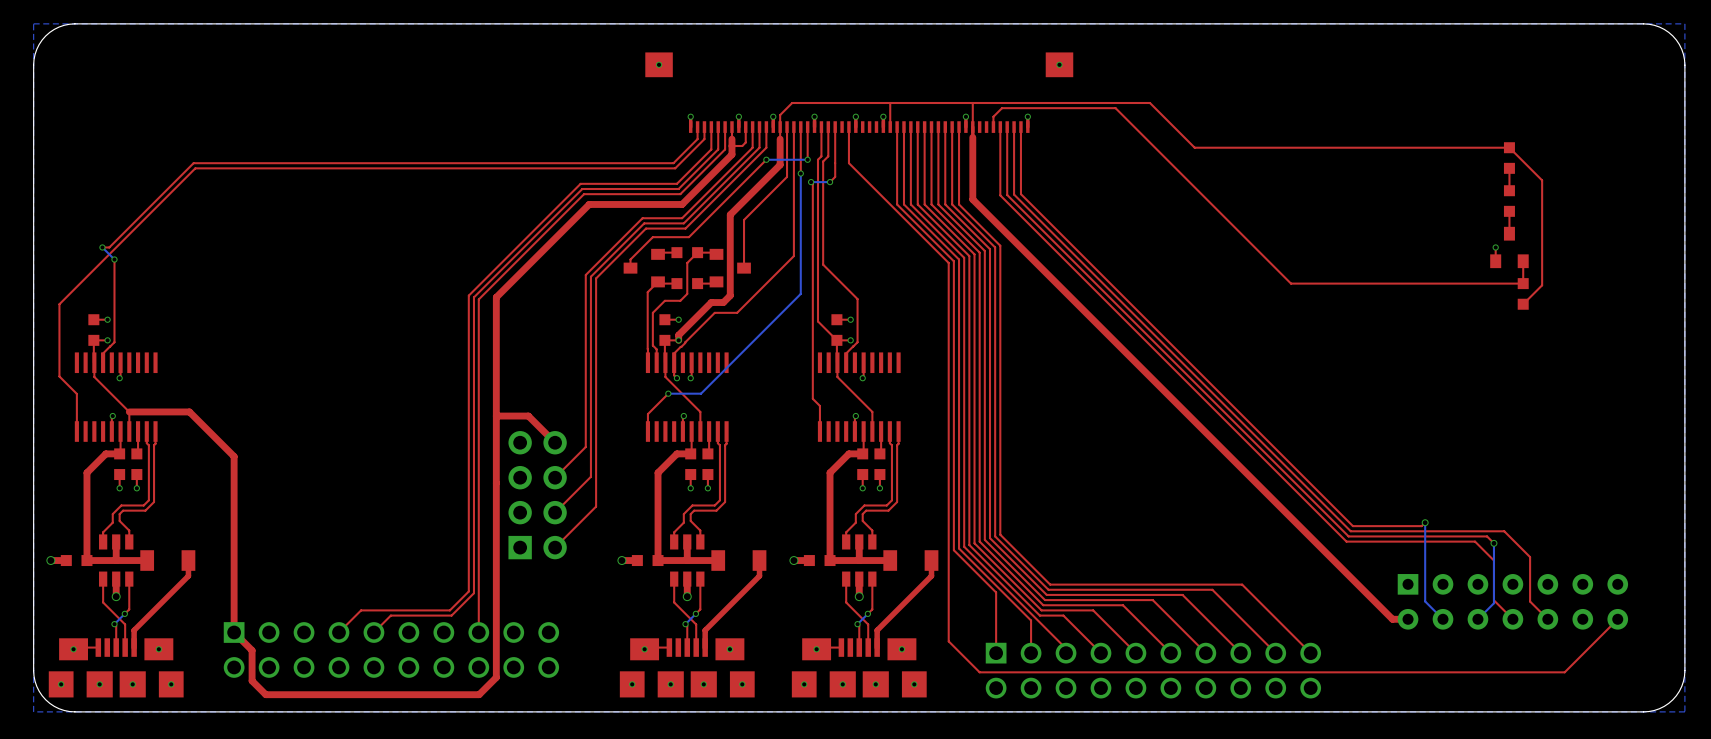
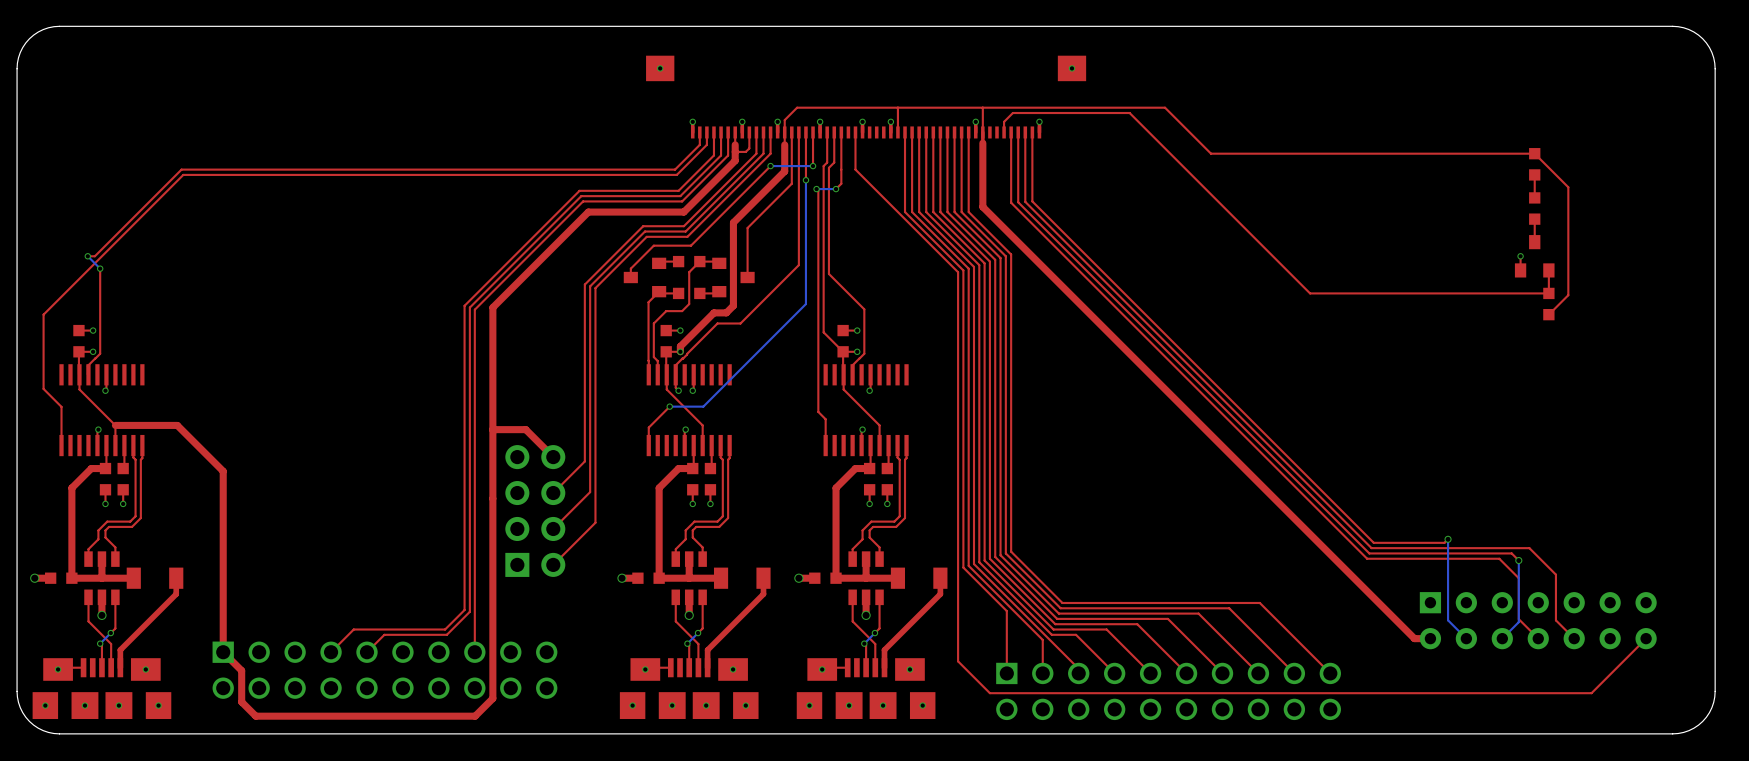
bottom zone outline: (1684, 23) (33, 23) (33, 711) (1684, 711) (1684, 23) -> none

